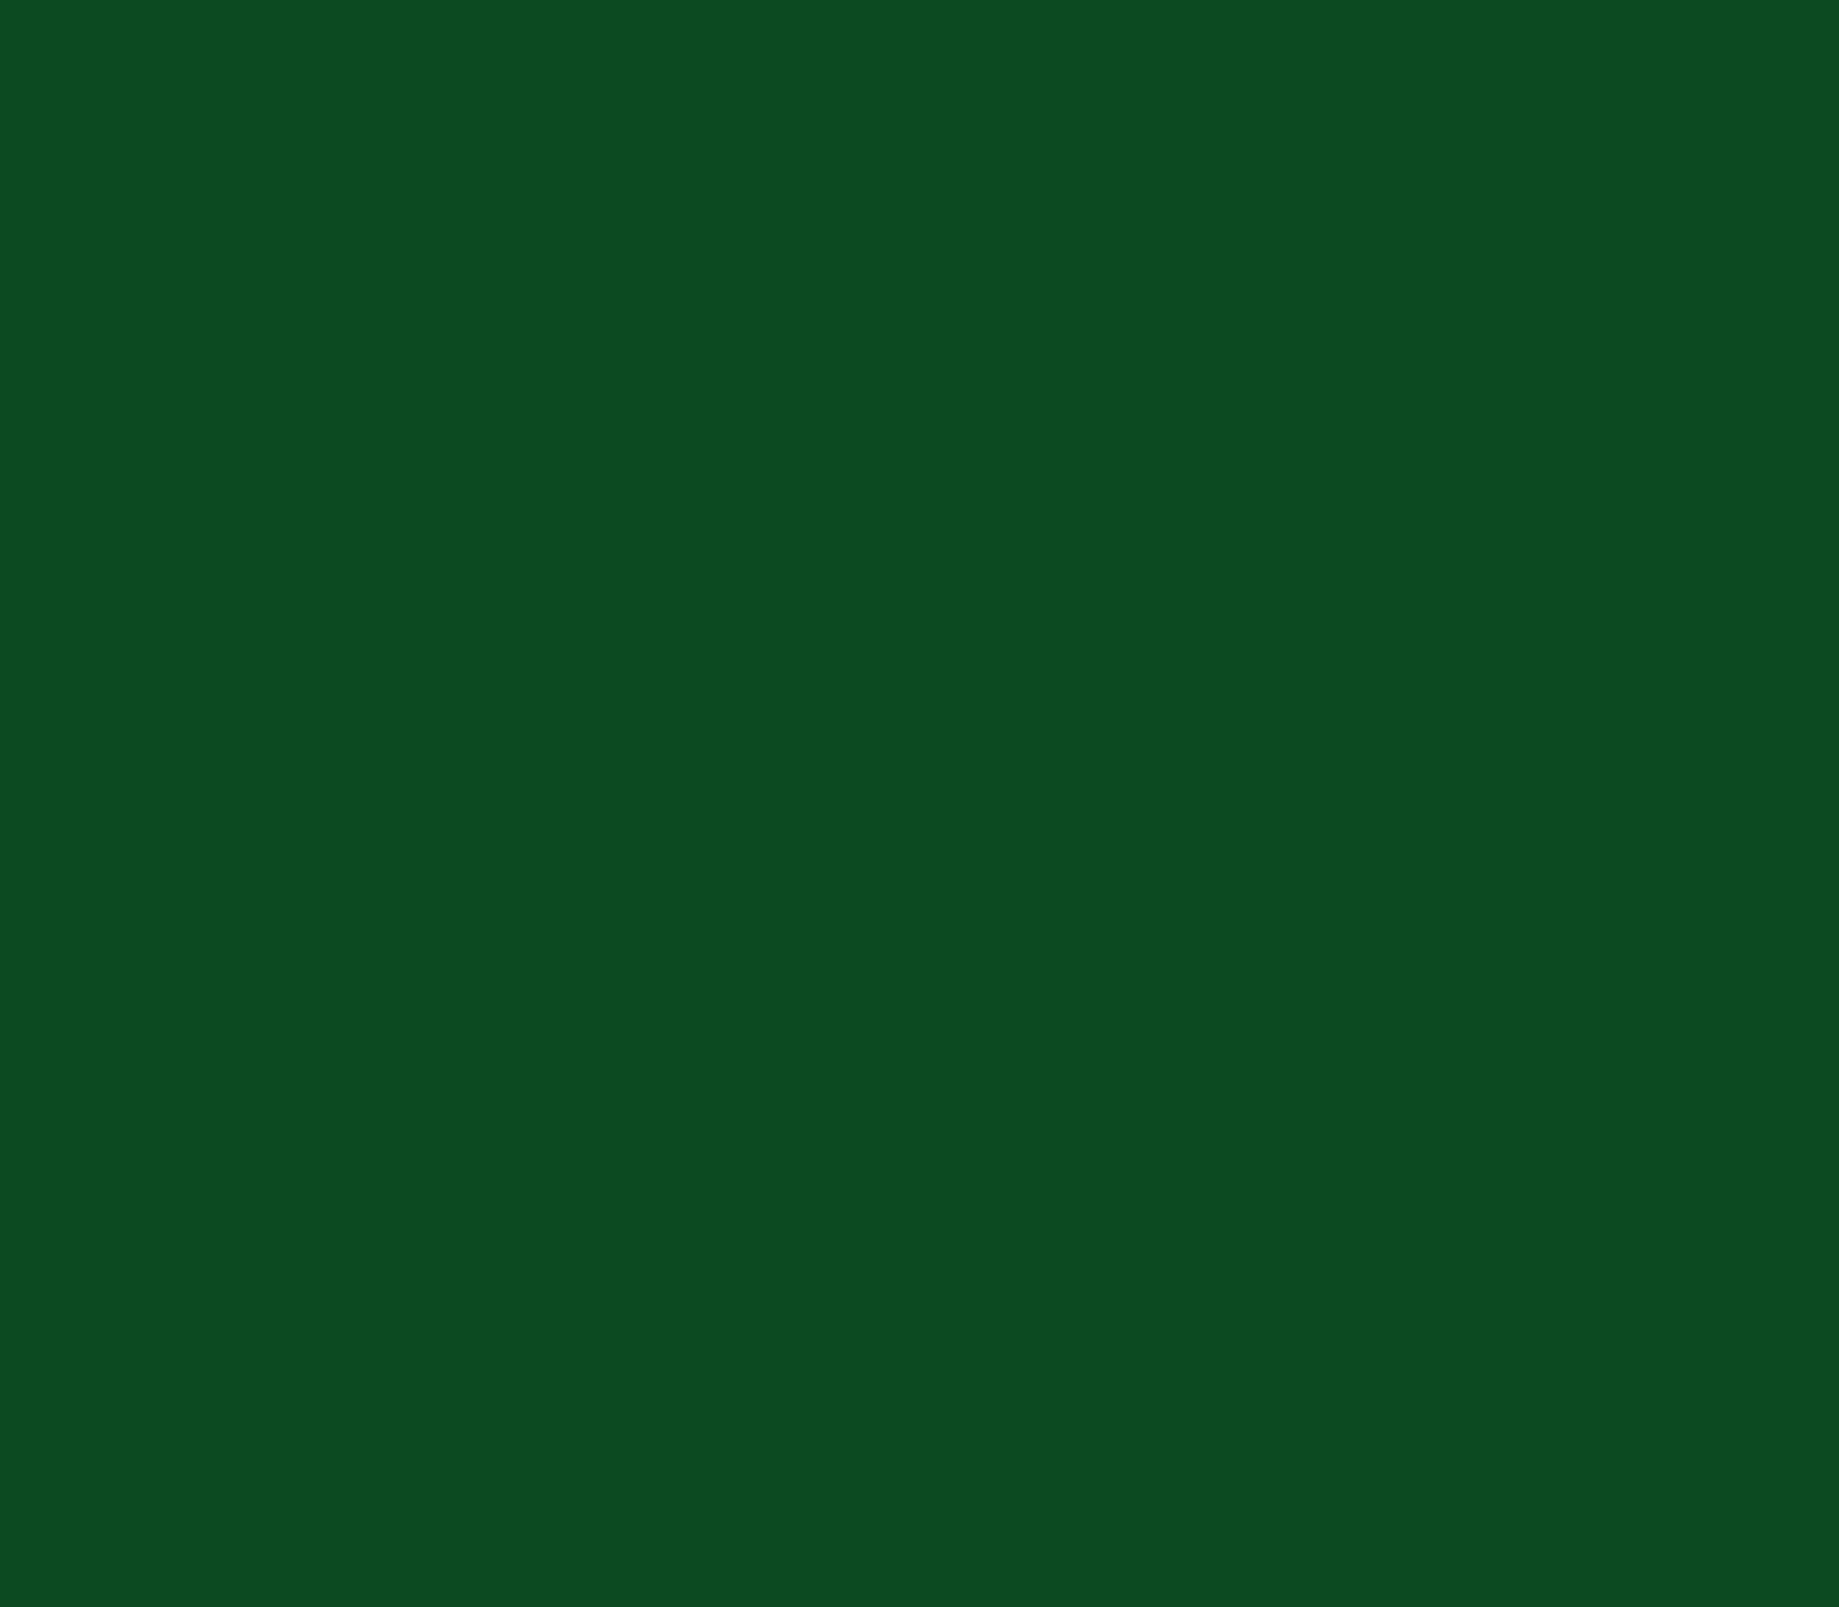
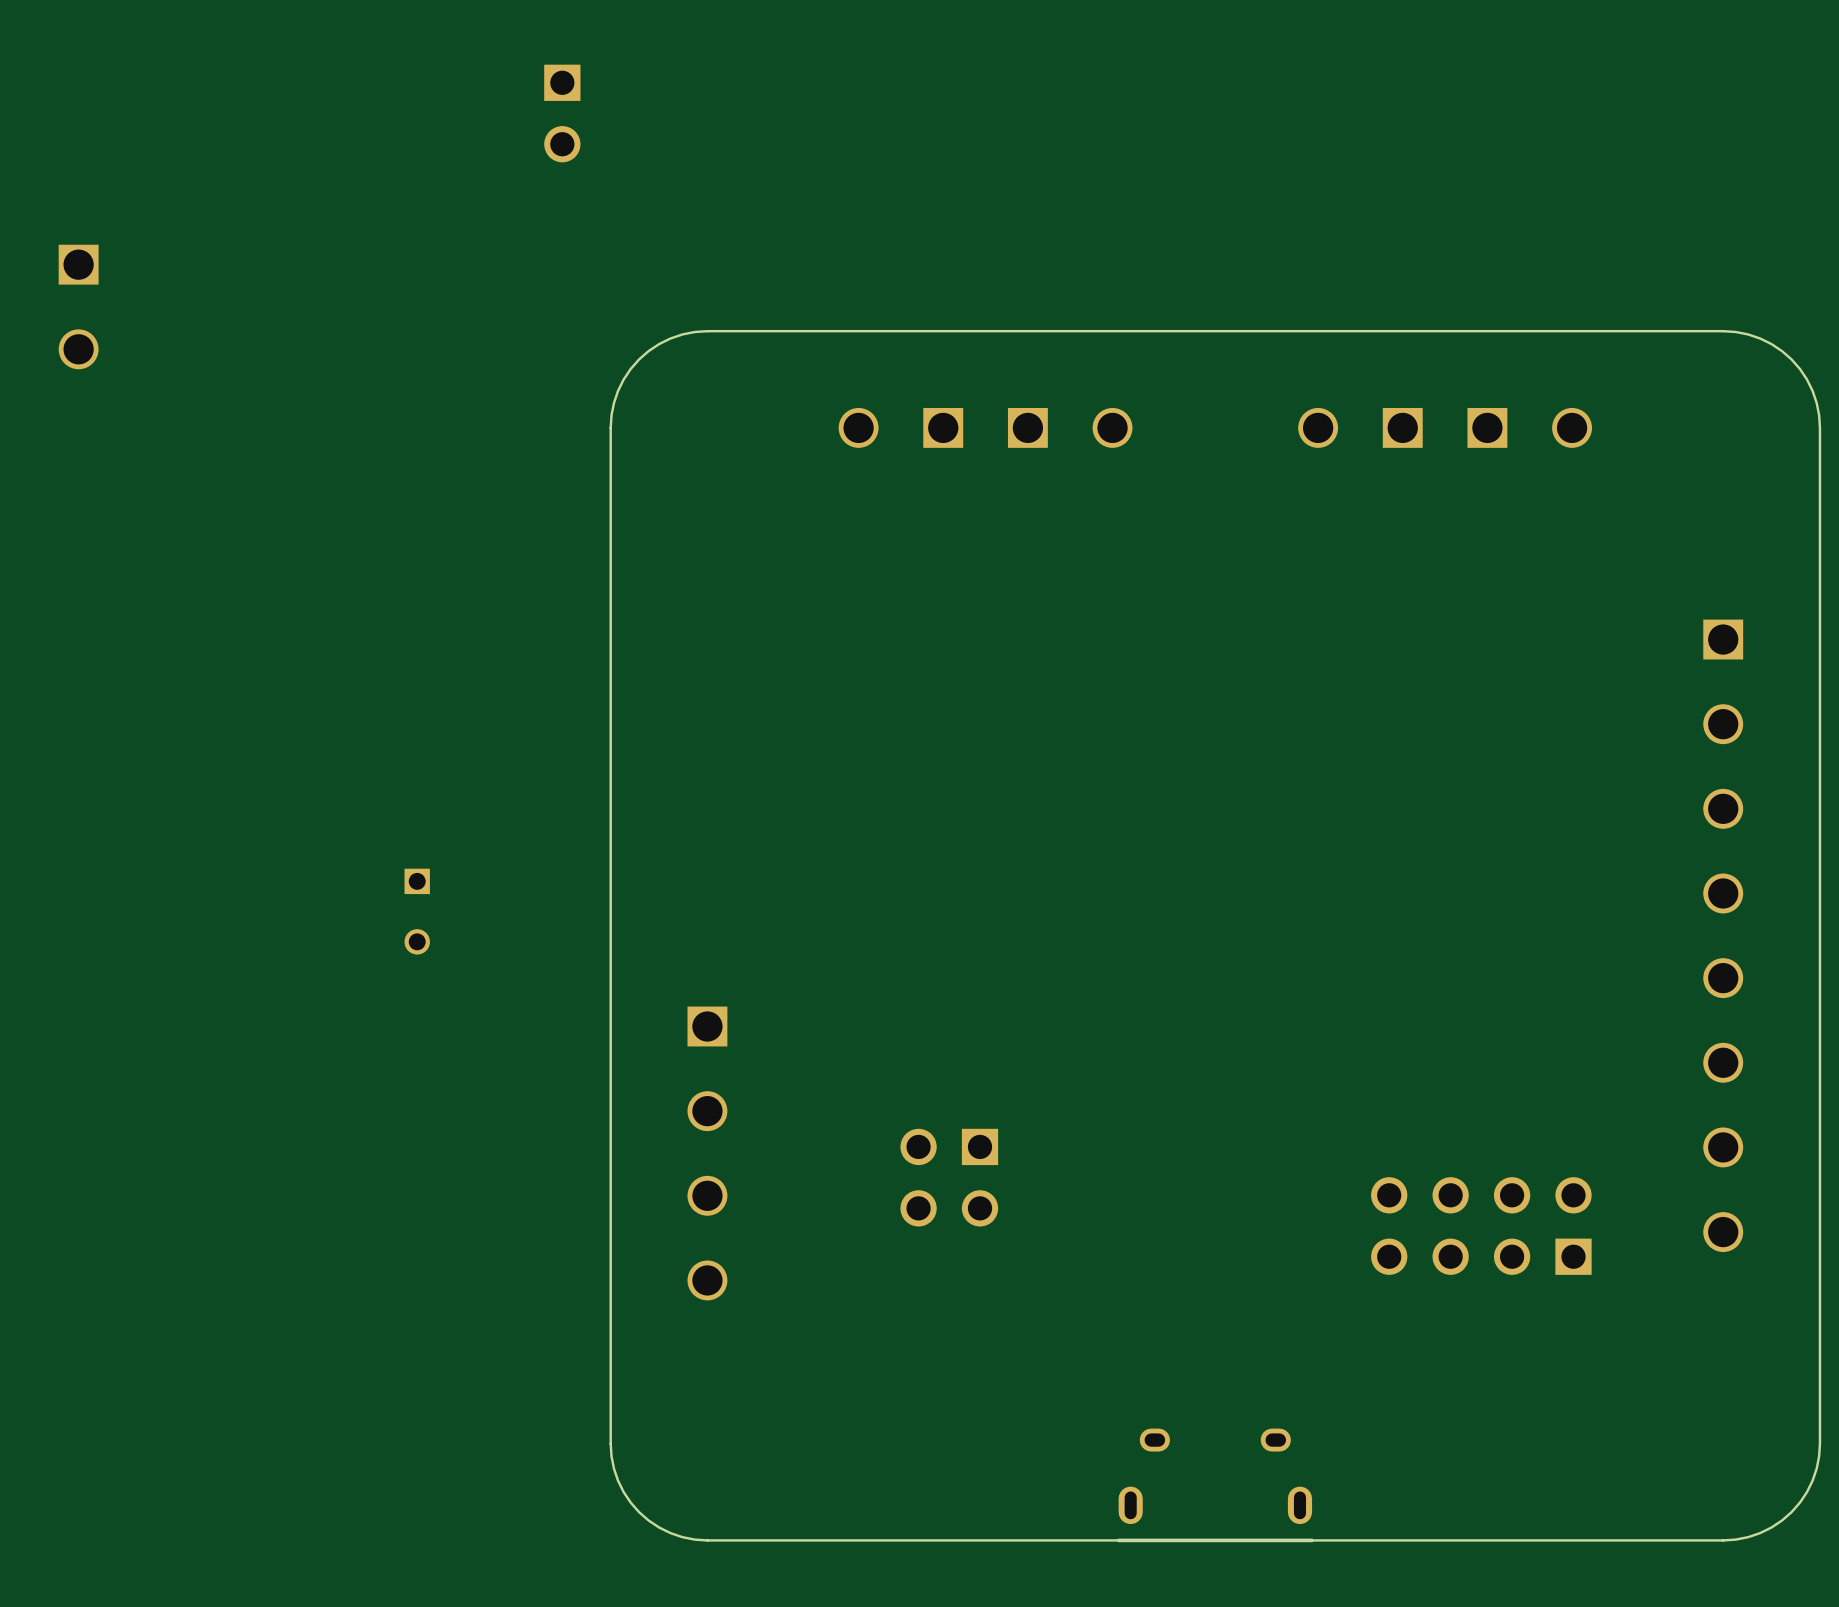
part: none -> (562, 113)
part: none -> (78, 306)
board edge: none -> (1723, 331) (707, 331) (682, 334) (670, 338) (648, 351) (639, 359) (623, 379) (618, 390) (614, 402) (610, 427) (610, 1443) (614, 1468) (618, 1480) (623, 1492) (639, 1512) (659, 1527) (670, 1533) (682, 1537) (707, 1540) (1723, 1540) (1748, 1537) (1760, 1533) (1771, 1527) (1791, 1512) (1799, 1502) (1812, 1480) (1816, 1468) (1819, 1443) (1819, 427) (1816, 402) (1812, 390) (1799, 369) (1791, 359) (1782, 351) (1760, 338) (1748, 334) (1723, 331)
part: none -> (900, 427)
part: none -> (1070, 427)
part: none -> (1360, 427)
part: none -> (1529, 427)
part: none -> (417, 911)
part: none -> (1723, 935)
part: none -> (707, 1153)
part: none -> (949, 1177)
part: none -> (1481, 1226)
part: none -> (1215, 1485)

